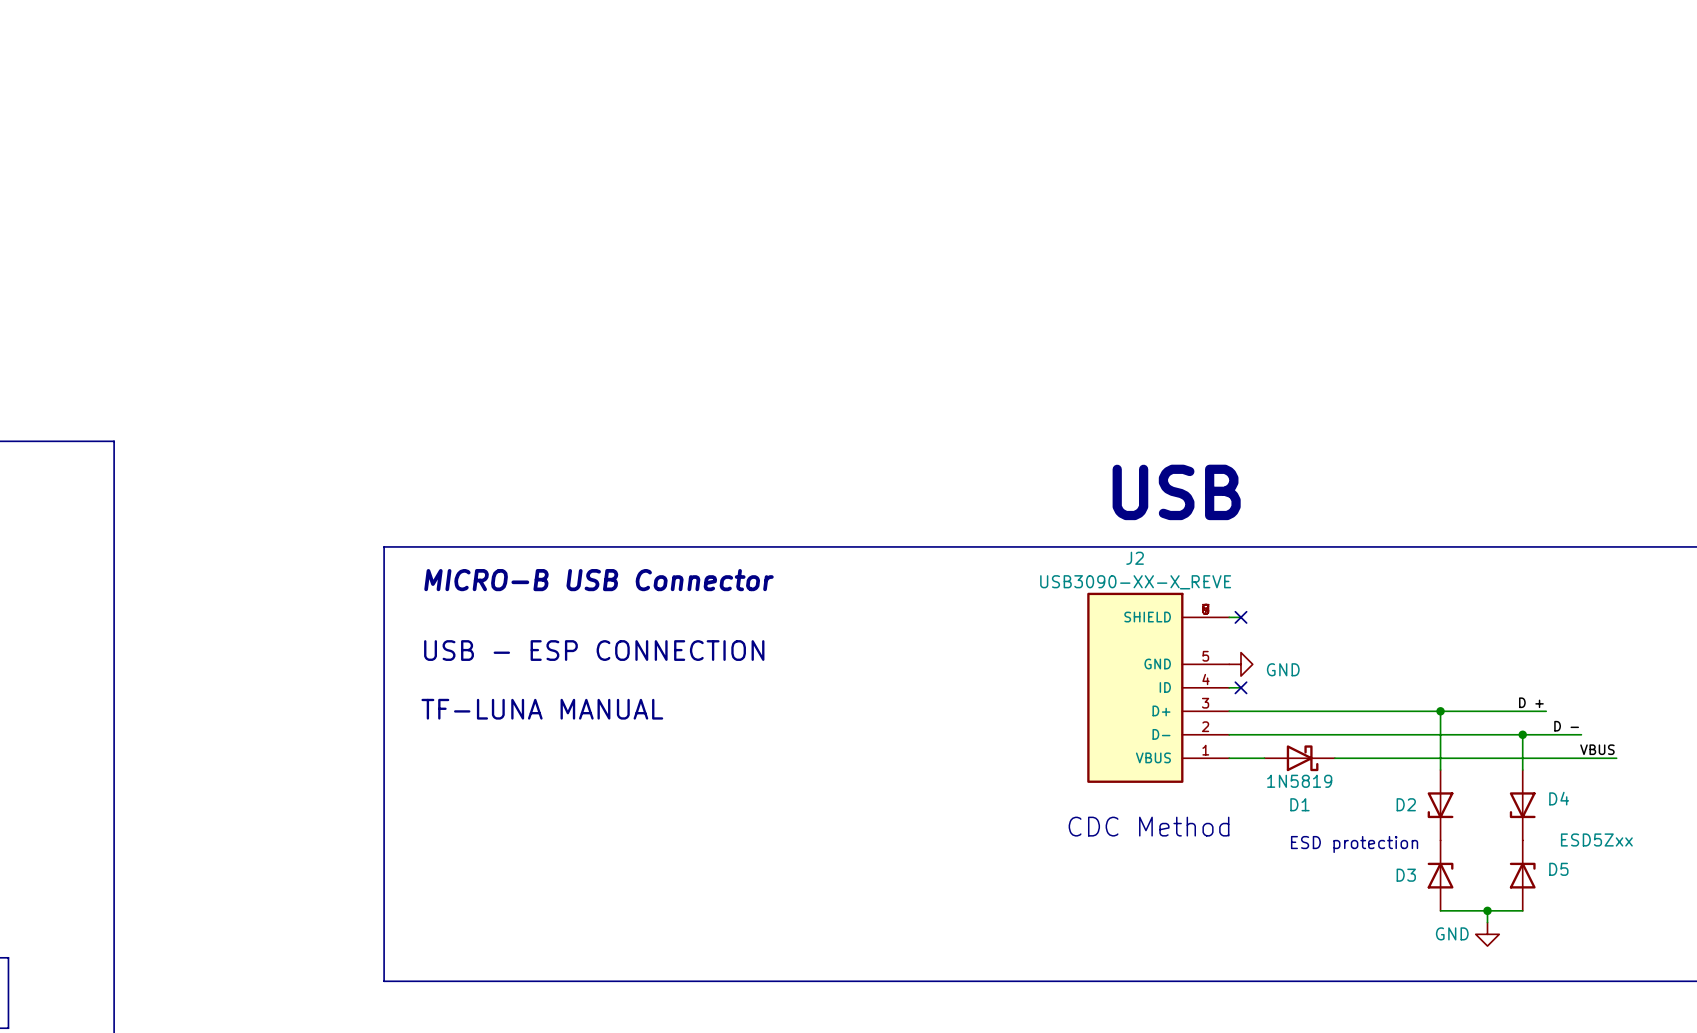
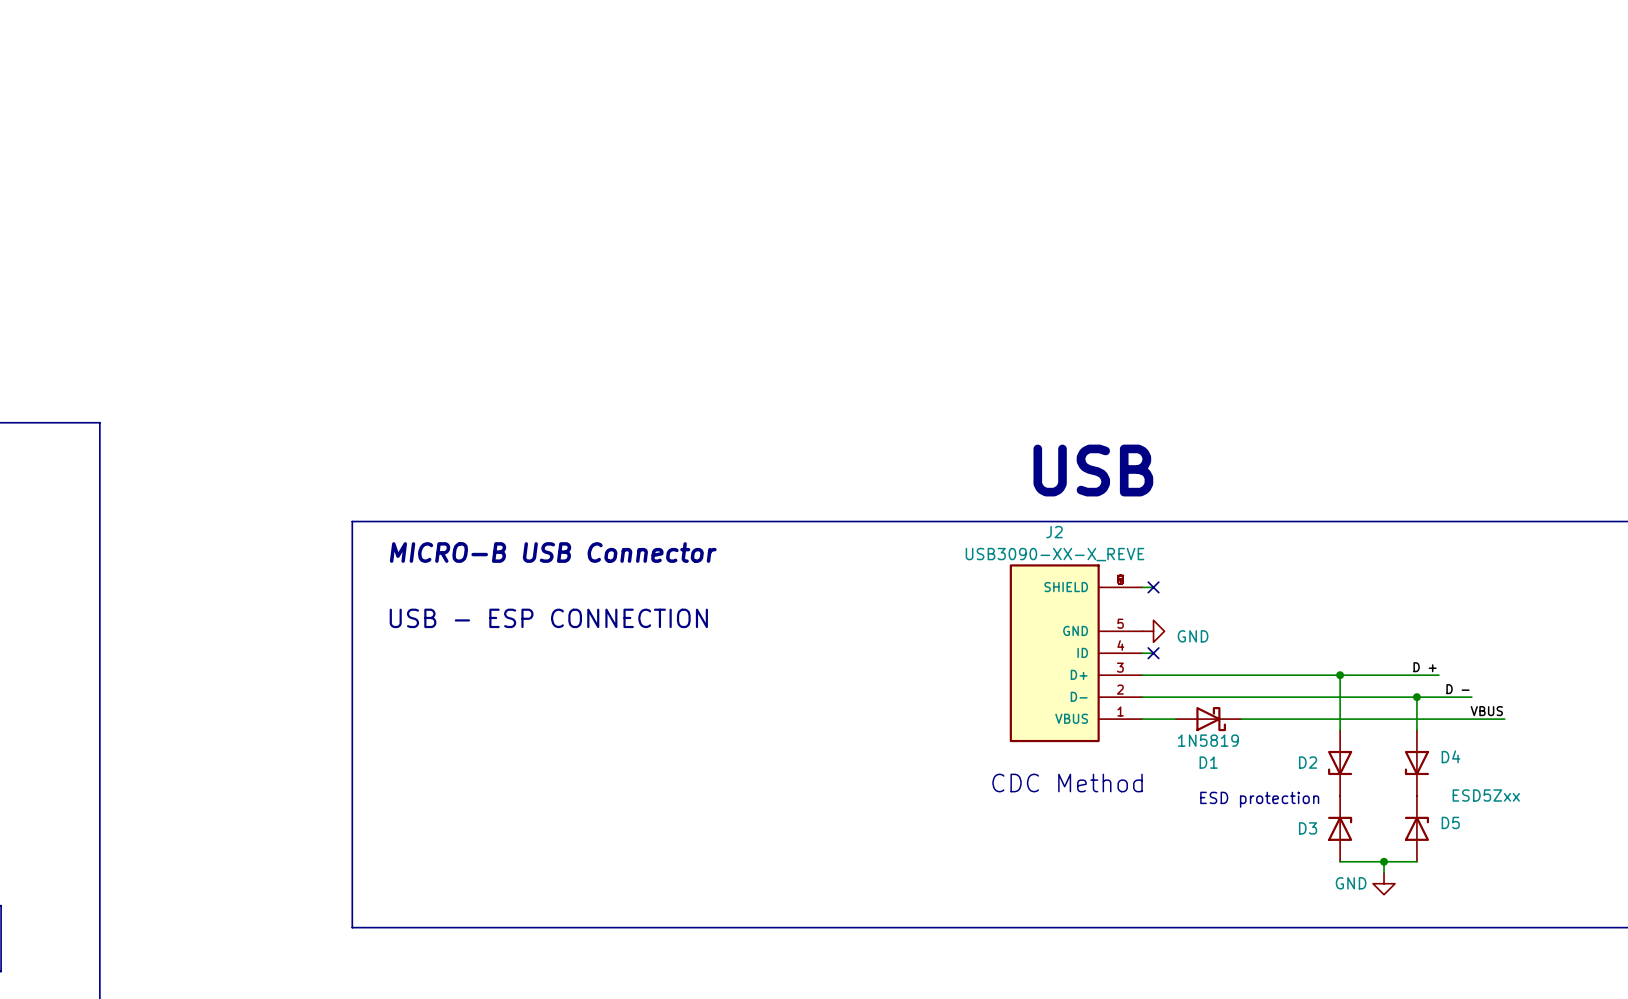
text: TF-LUNA MANUAL (542, 709) -> none

